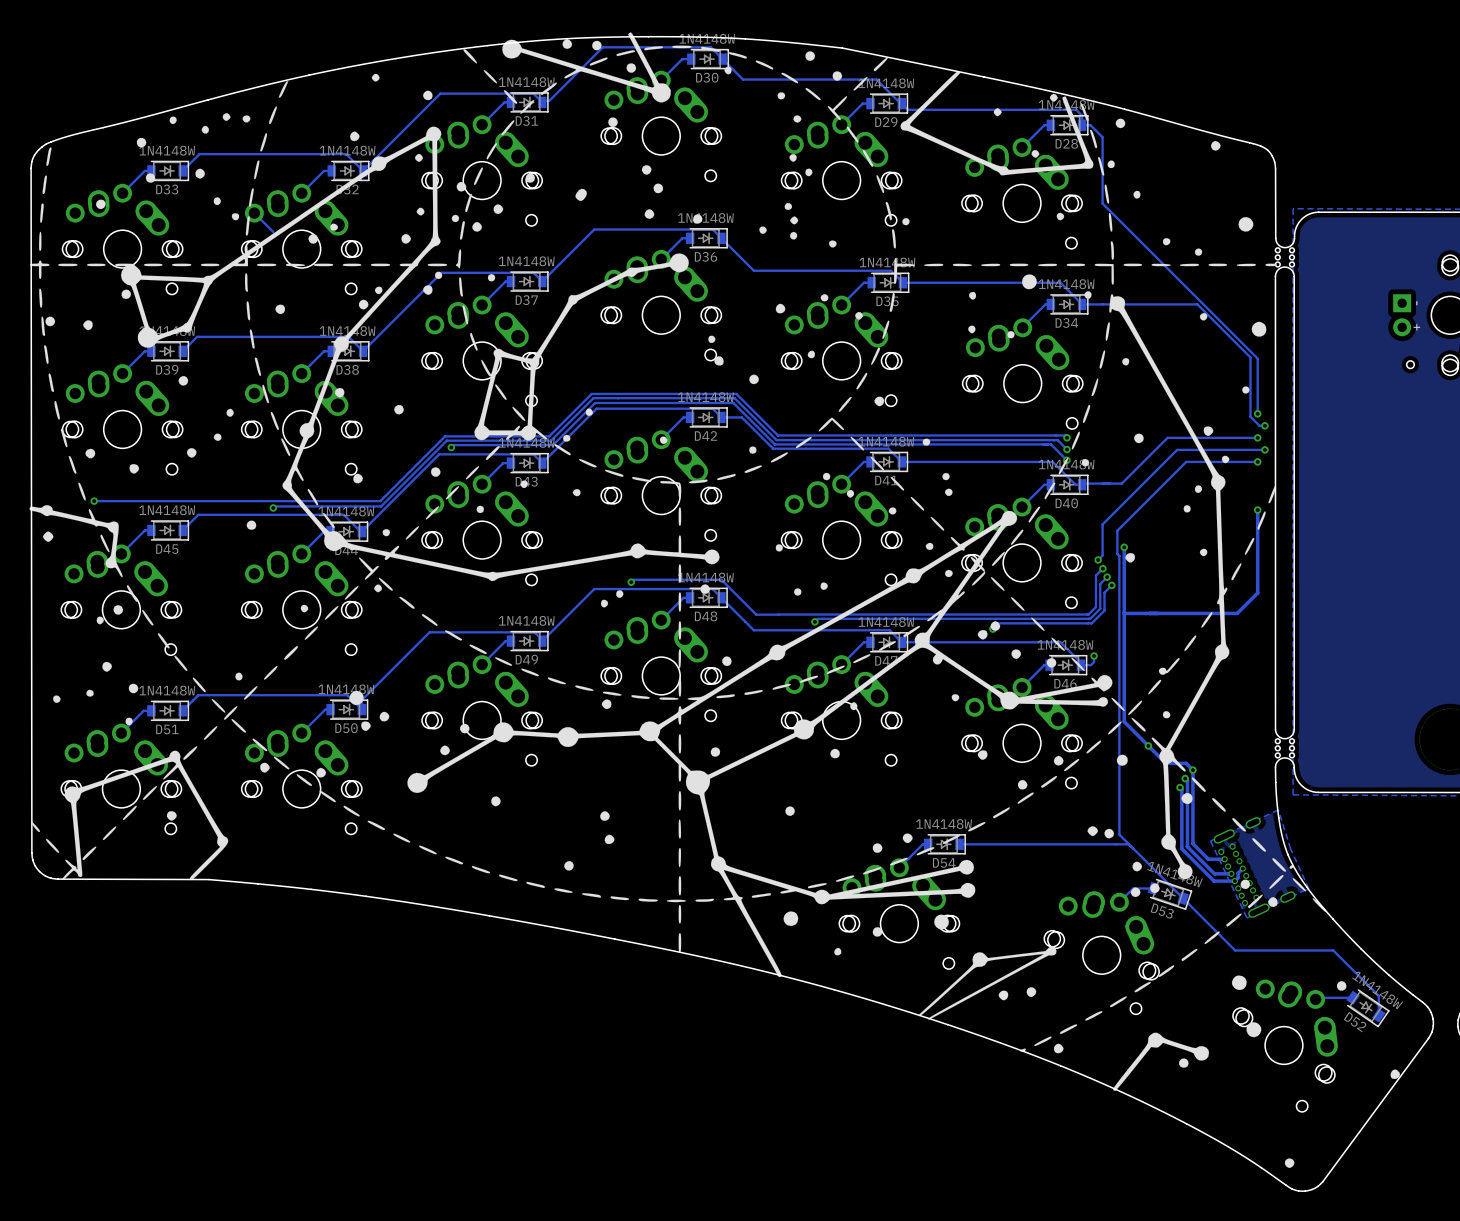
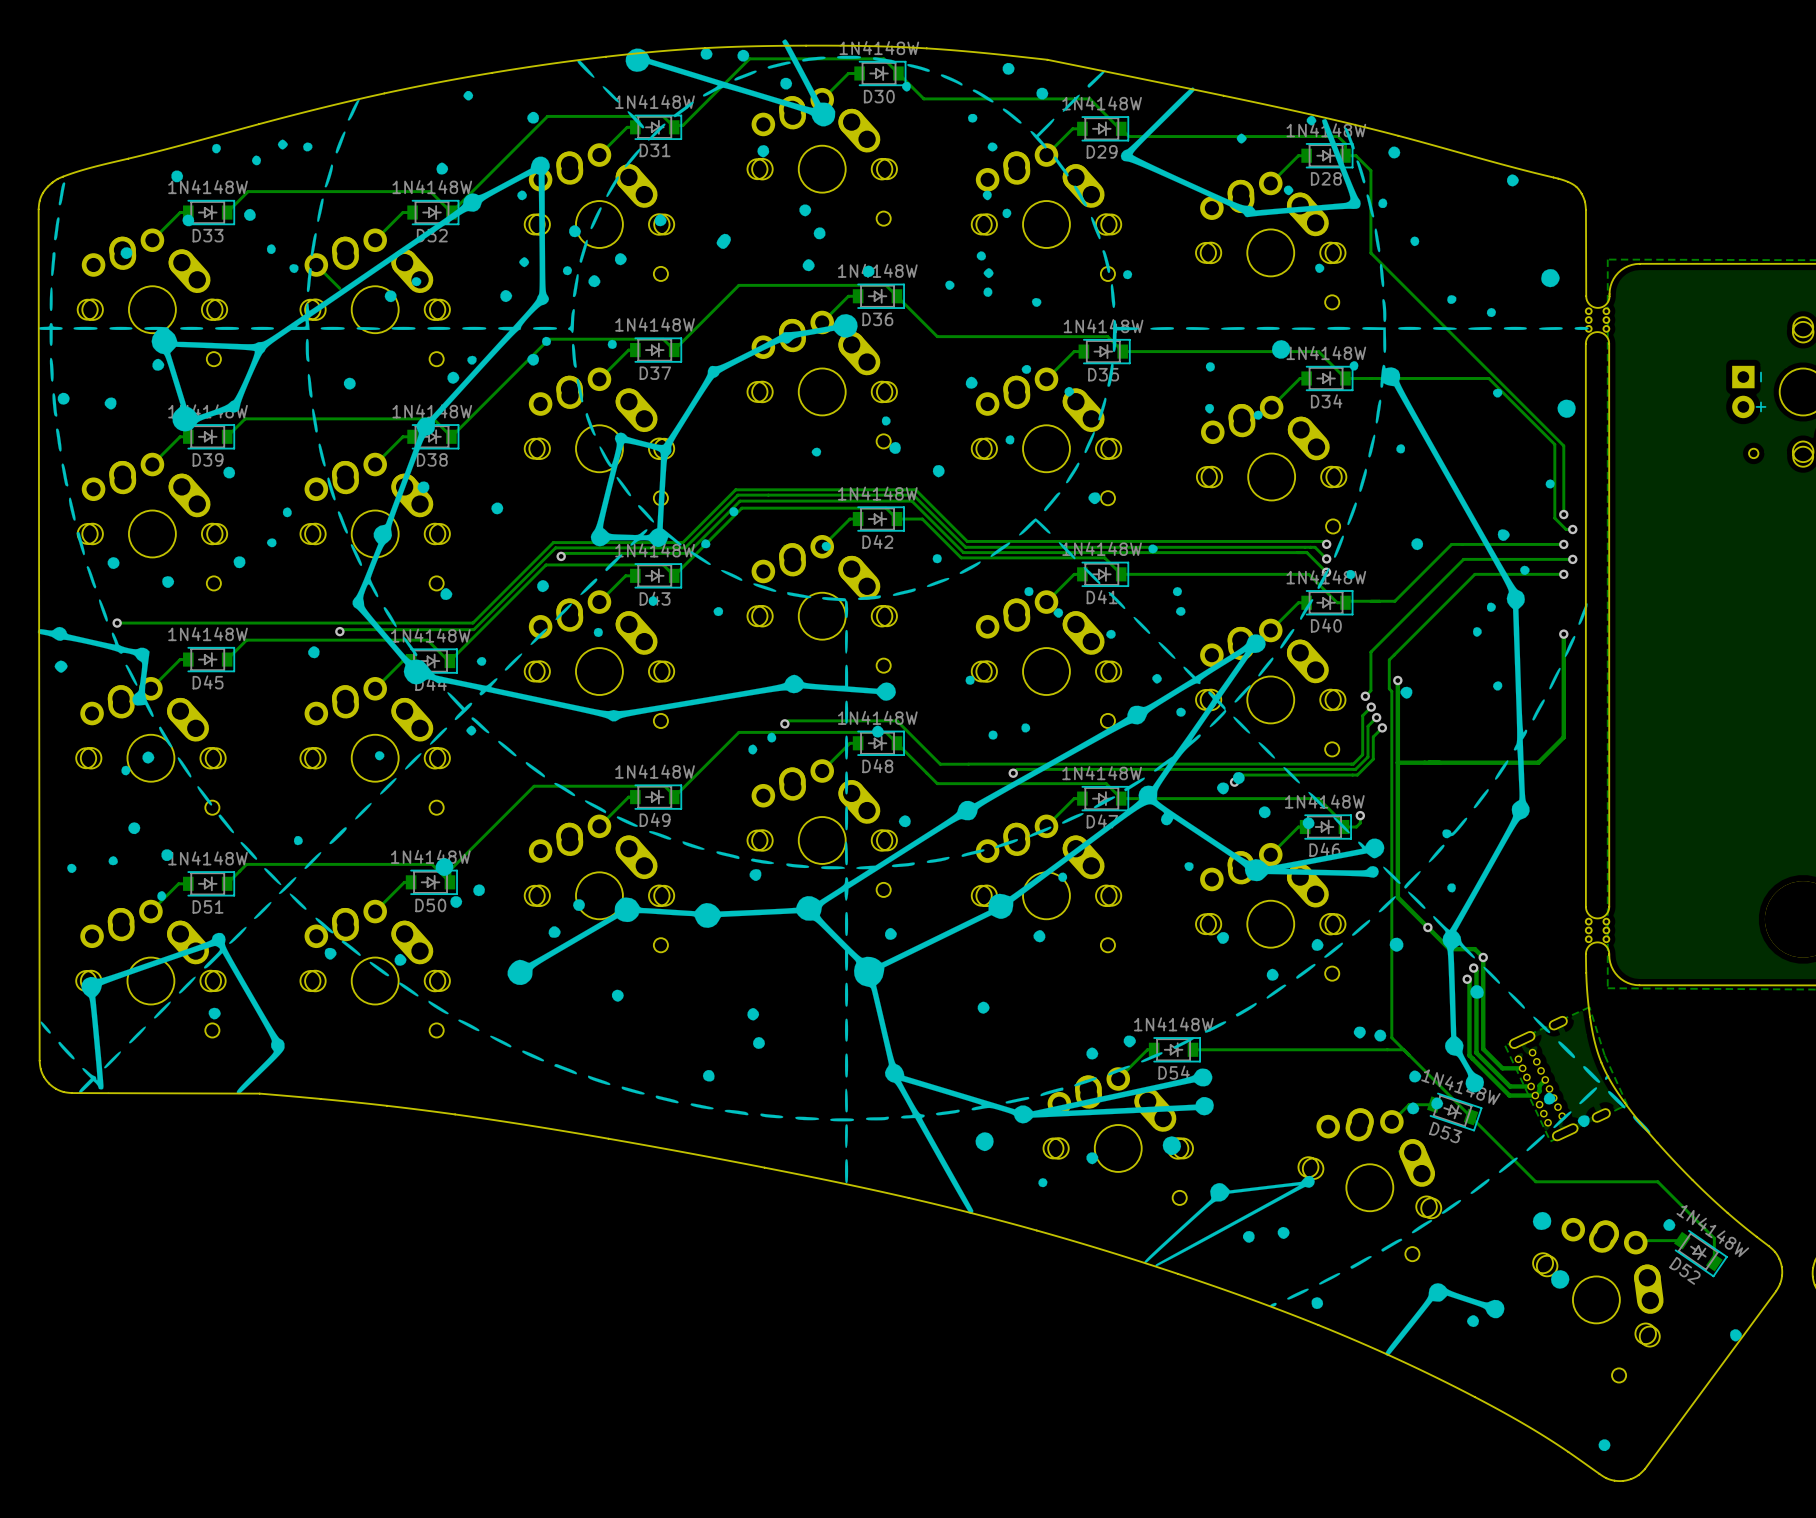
drawing shape: [29, 32, 1401, 1169] -> [37, 39, 1742, 1452]

